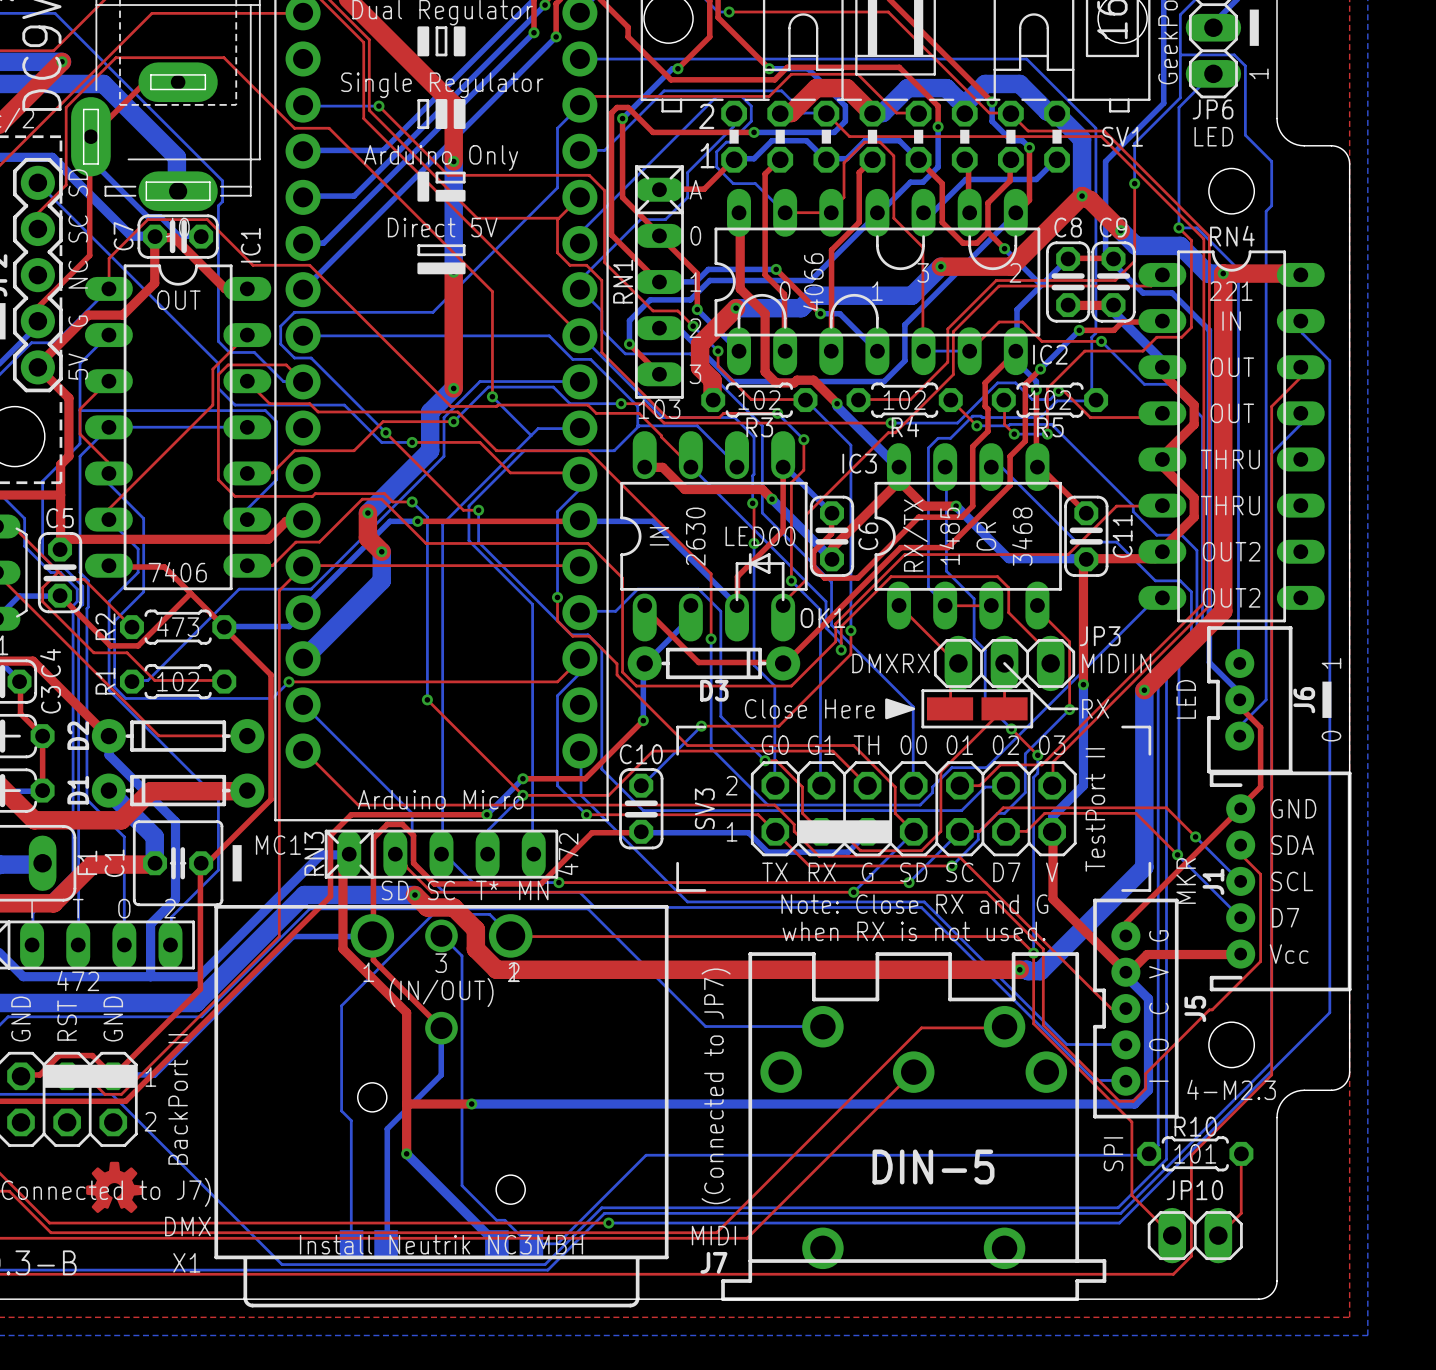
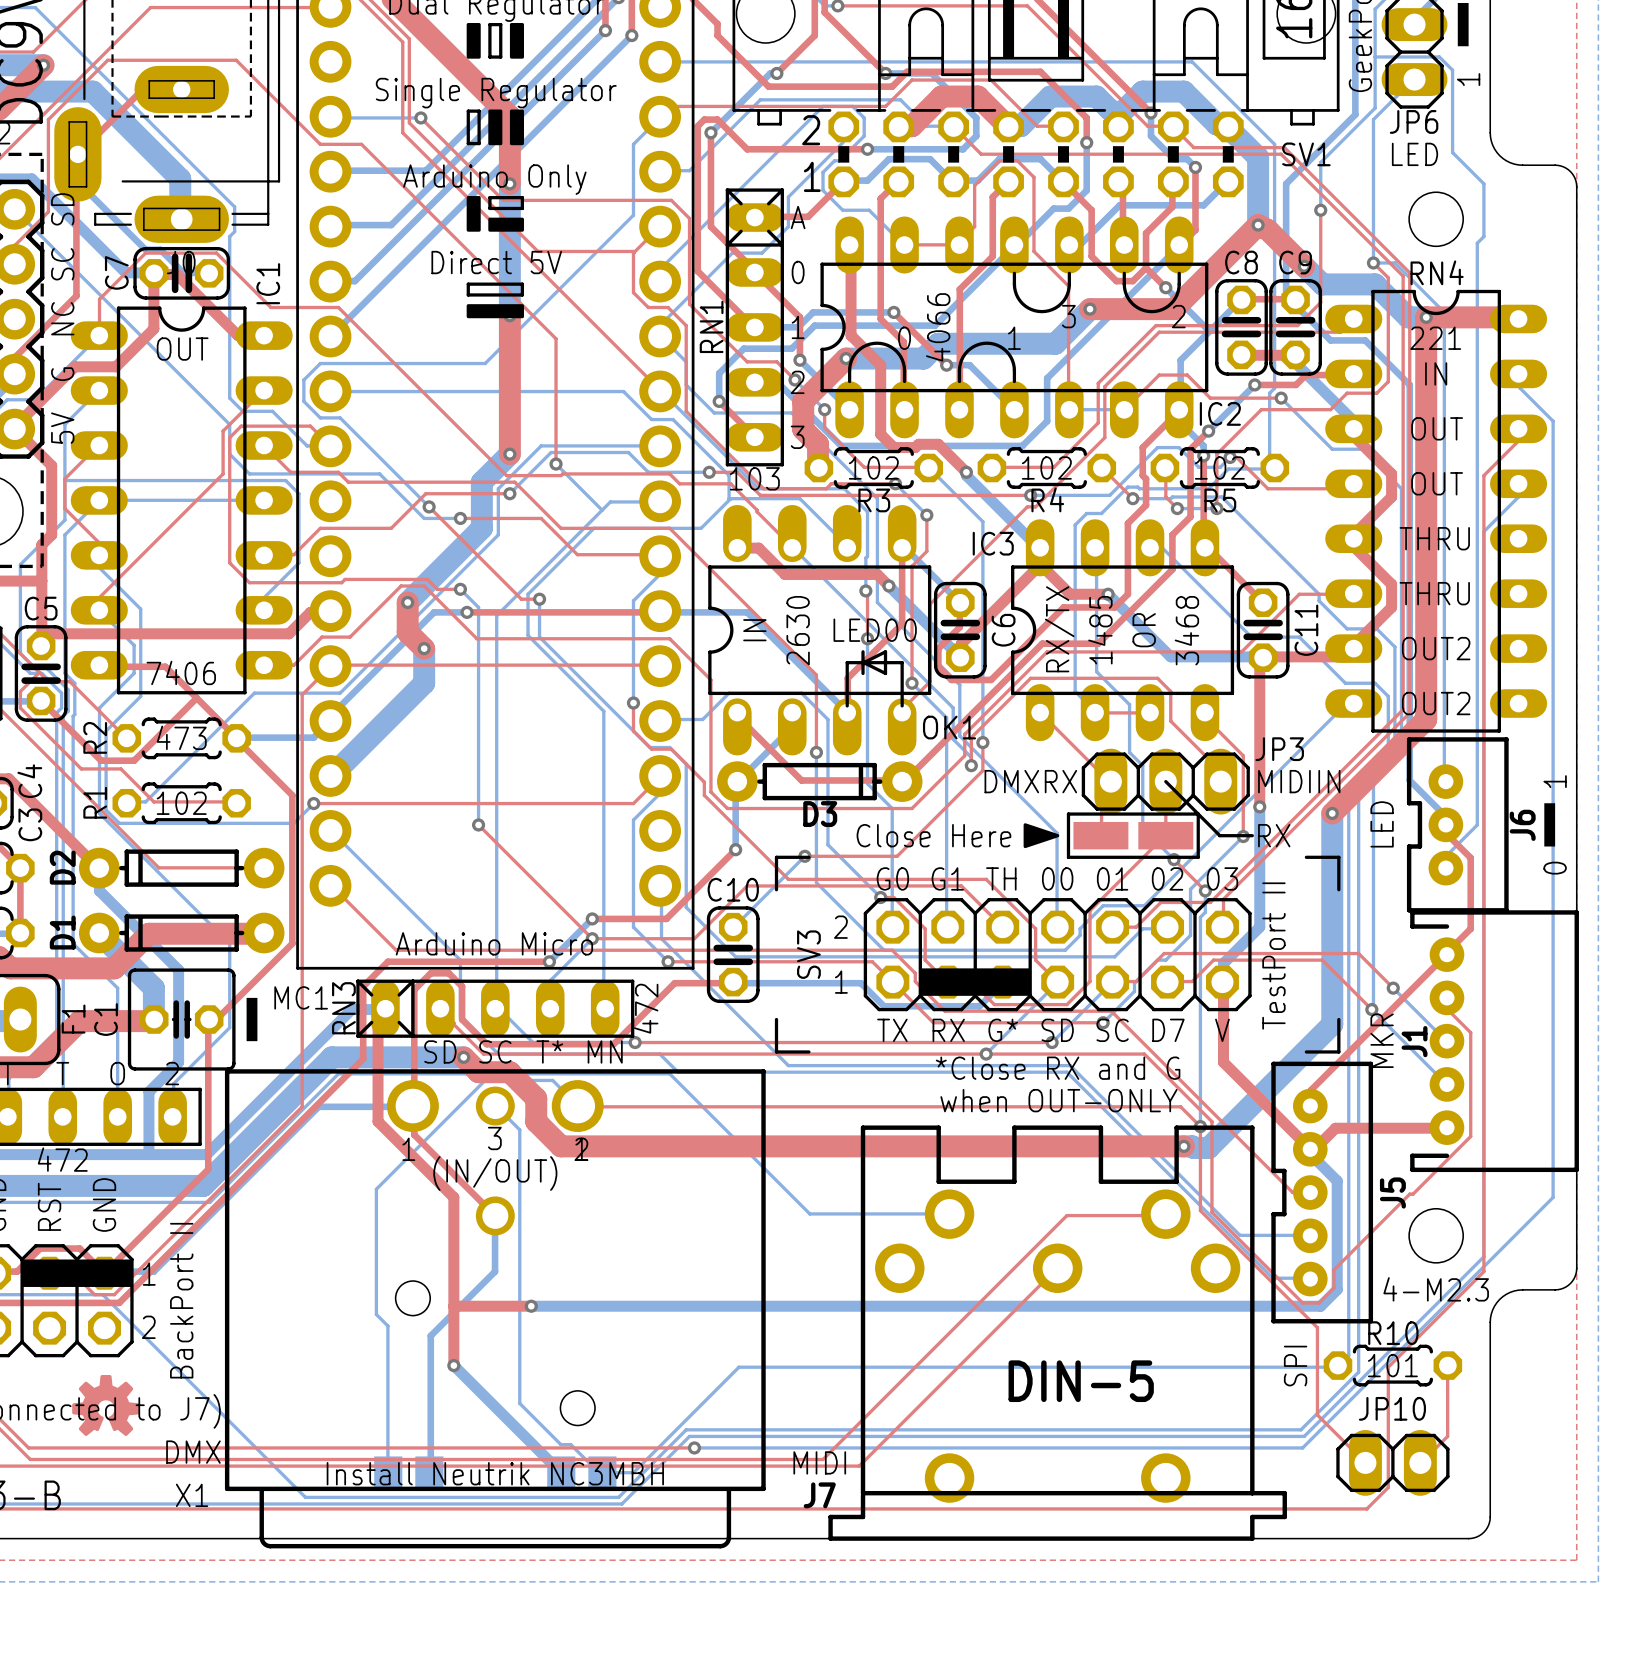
text: GND (1293, 808) -> none
text: SDA (1292, 845) -> none
text: G (867, 872) -> G* (1003, 1030)
text: SCL (1292, 881) -> none
text: Note: Close RX and G (914, 904) -> *Close RX and G (1058, 1068)
text: D7 (1285, 917) -> none
text: when RX is not used. (914, 931) -> when OUT-ONLY (1058, 1100)
text: G (1158, 935) -> none
text: Vcc (1289, 954) -> none
text: V (1158, 972) -> none
text: C (1158, 1008) -> none
text: O (1158, 1044) -> none
text: I (1158, 1081) -> none
text: (Connected to JP7) (716, 1086) -> none

